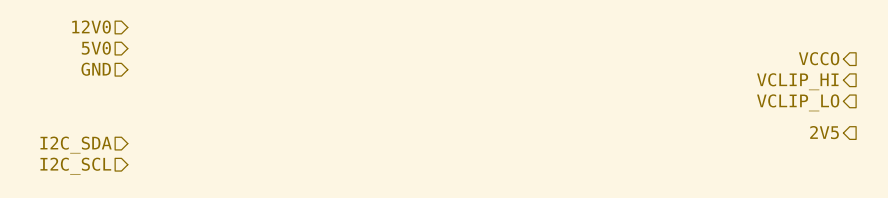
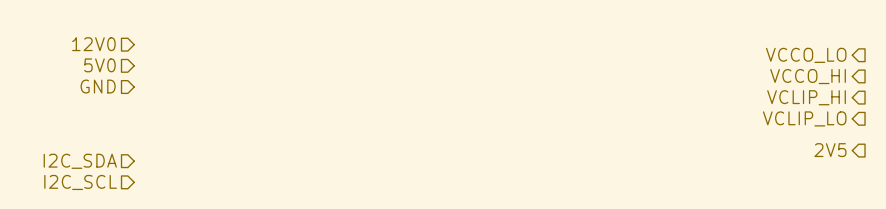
hierarchical label: none -> VCCO_LO (806, 55)
hierarchical label: VCCO (819, 58) -> VCCO_HI (808, 76)

